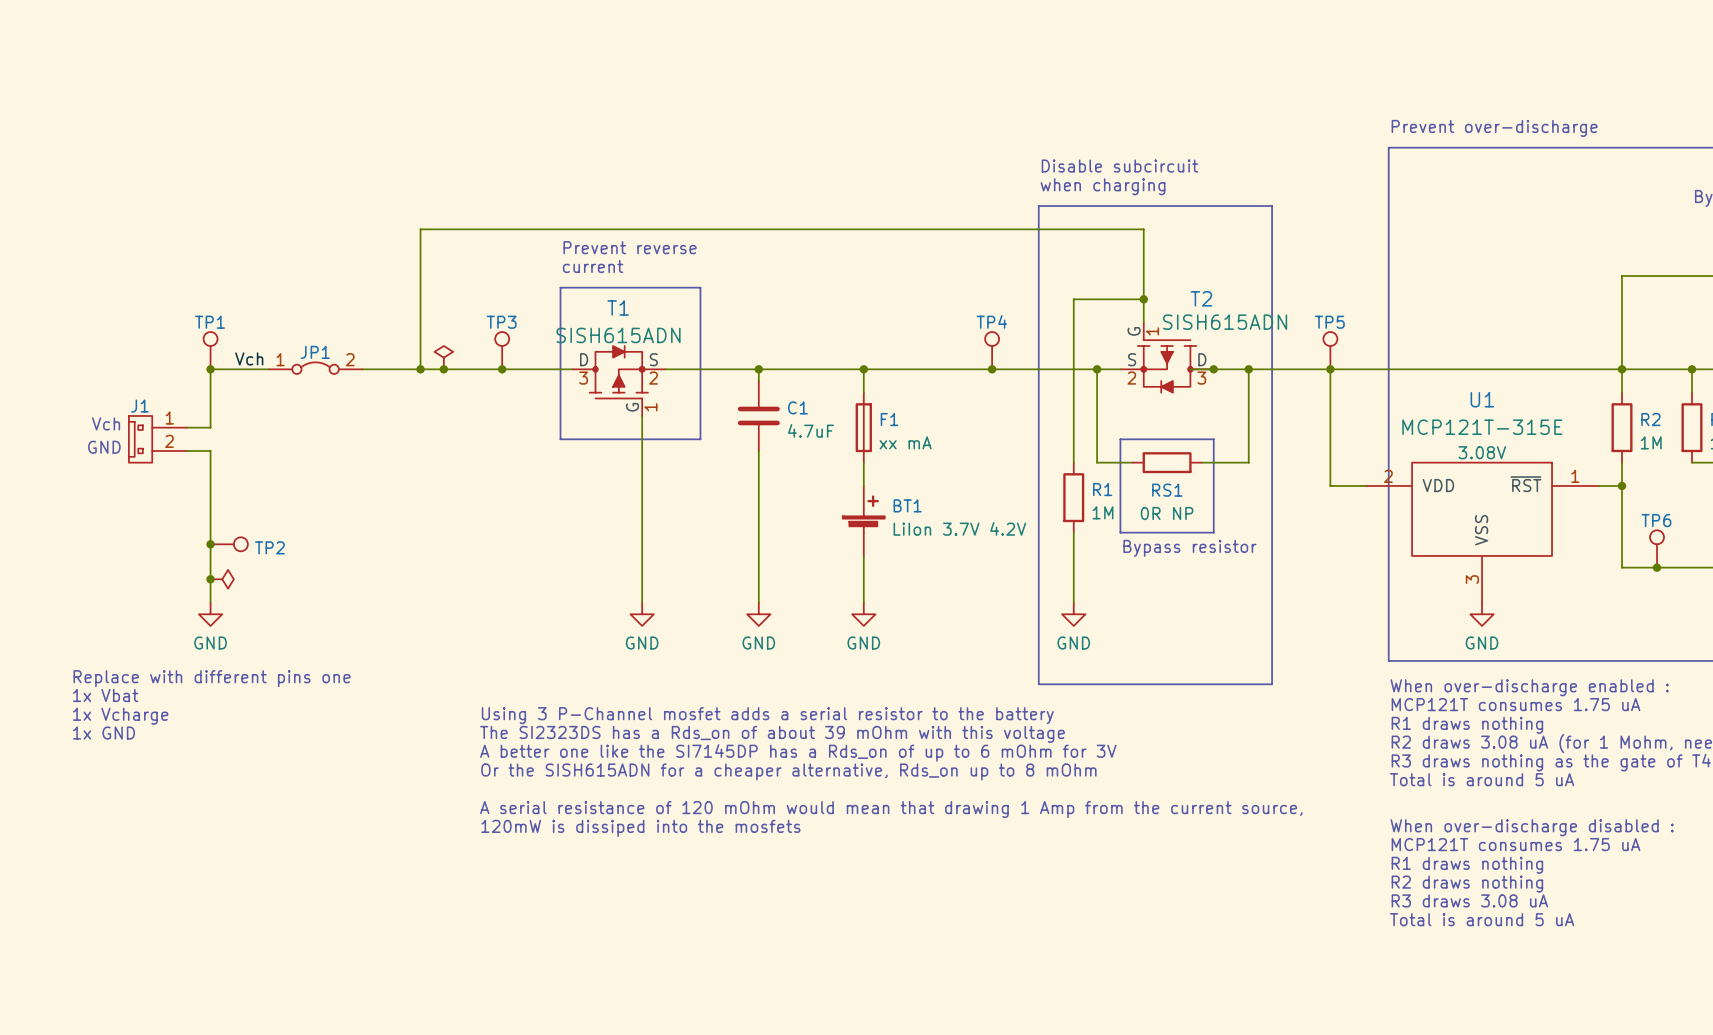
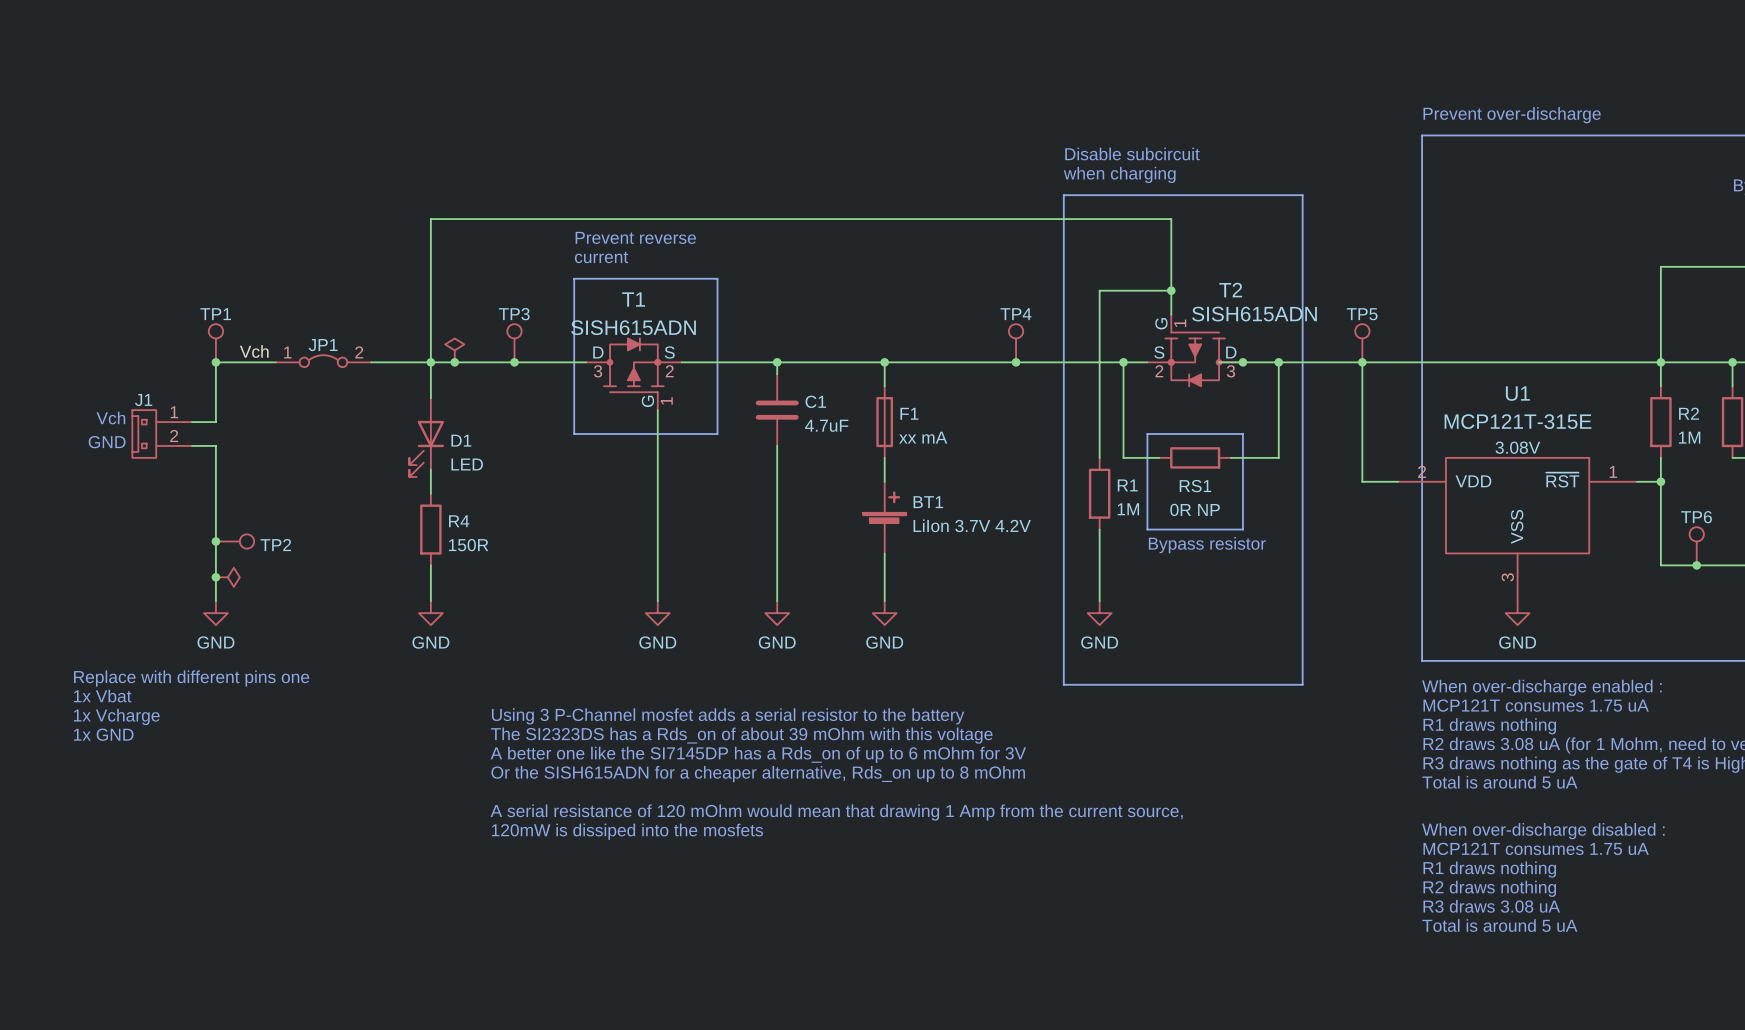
wire: none -> (430, 362) (430, 398)
D1: none -> LED (426, 437)
wire: none -> (430, 469) (430, 493)
R4: none -> 150R (430, 529)
wire: none -> (430, 565) (430, 601)
power symbol: none -> GND (430, 613)

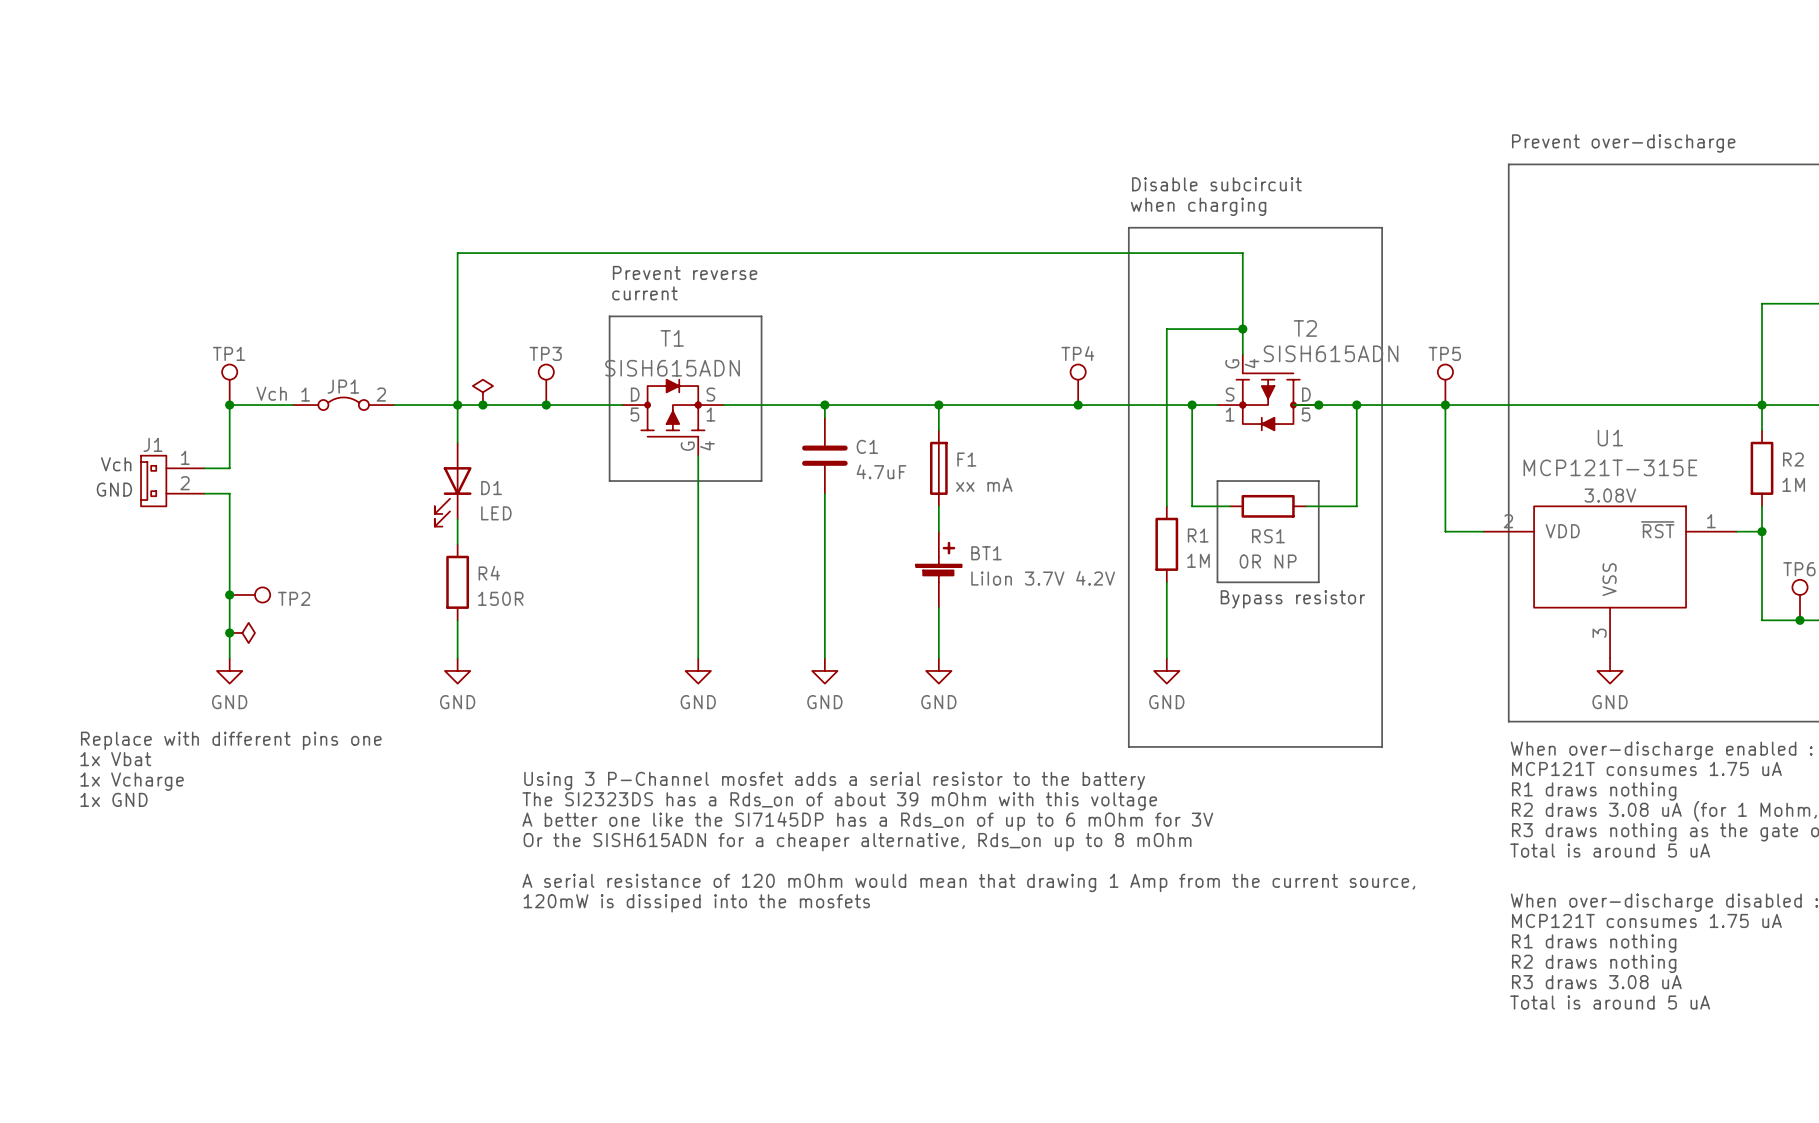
T2 pin number: 1 (1180, 323) -> 4 (1251, 363)
T1 pin number: 3 (598, 371) -> 5 (634, 414)
T1 pin number: 2 (669, 371) -> 1 (710, 414)
T2 pin number: 2 (1159, 371) -> 1 (1230, 414)
T2 pin number: 3 (1230, 371) -> 5 (1306, 414)
T1 pin number: 1 (666, 400) -> 4 (707, 445)

